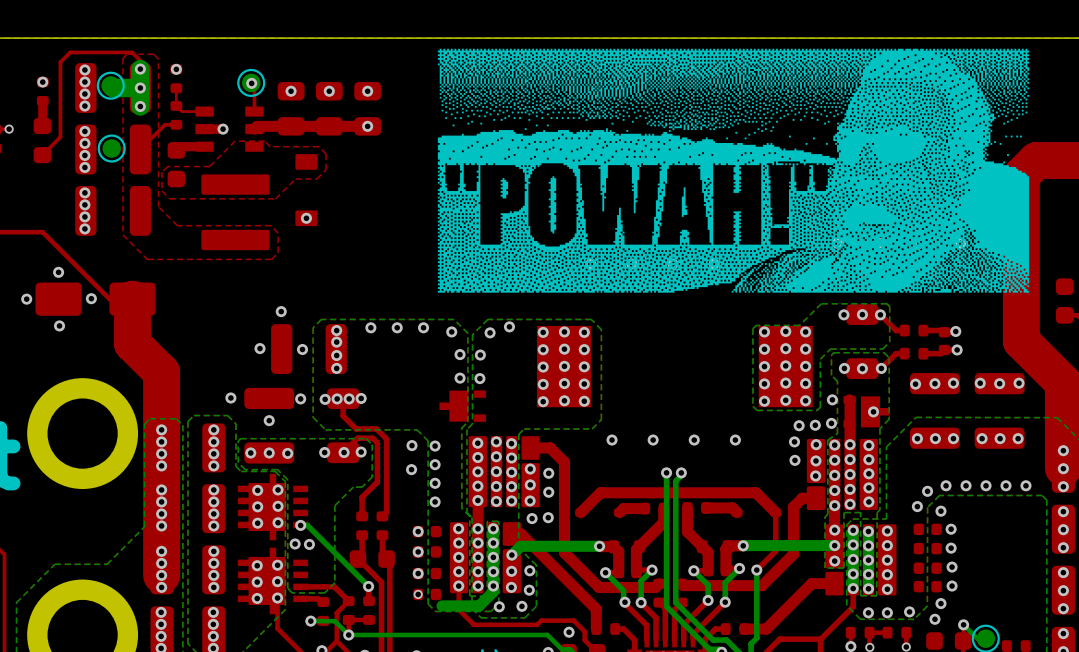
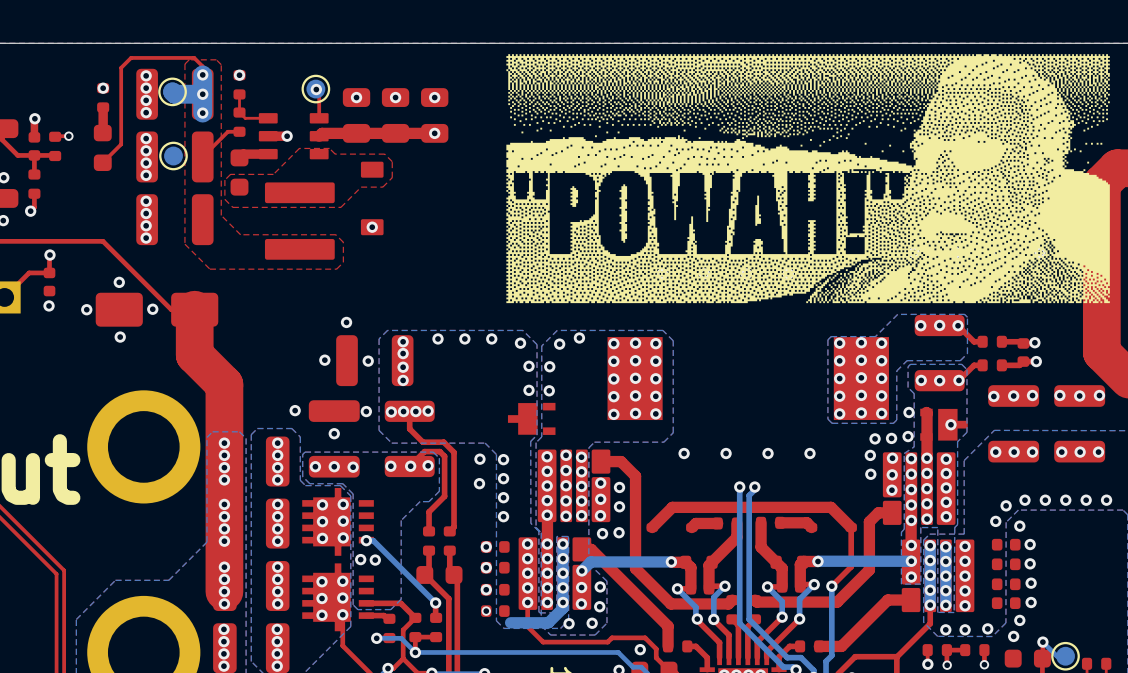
part footprint: [846, 304, 879, 380] -> [914, 314, 965, 392]
part footprint: [326, 388, 360, 464] -> [384, 400, 435, 478]

